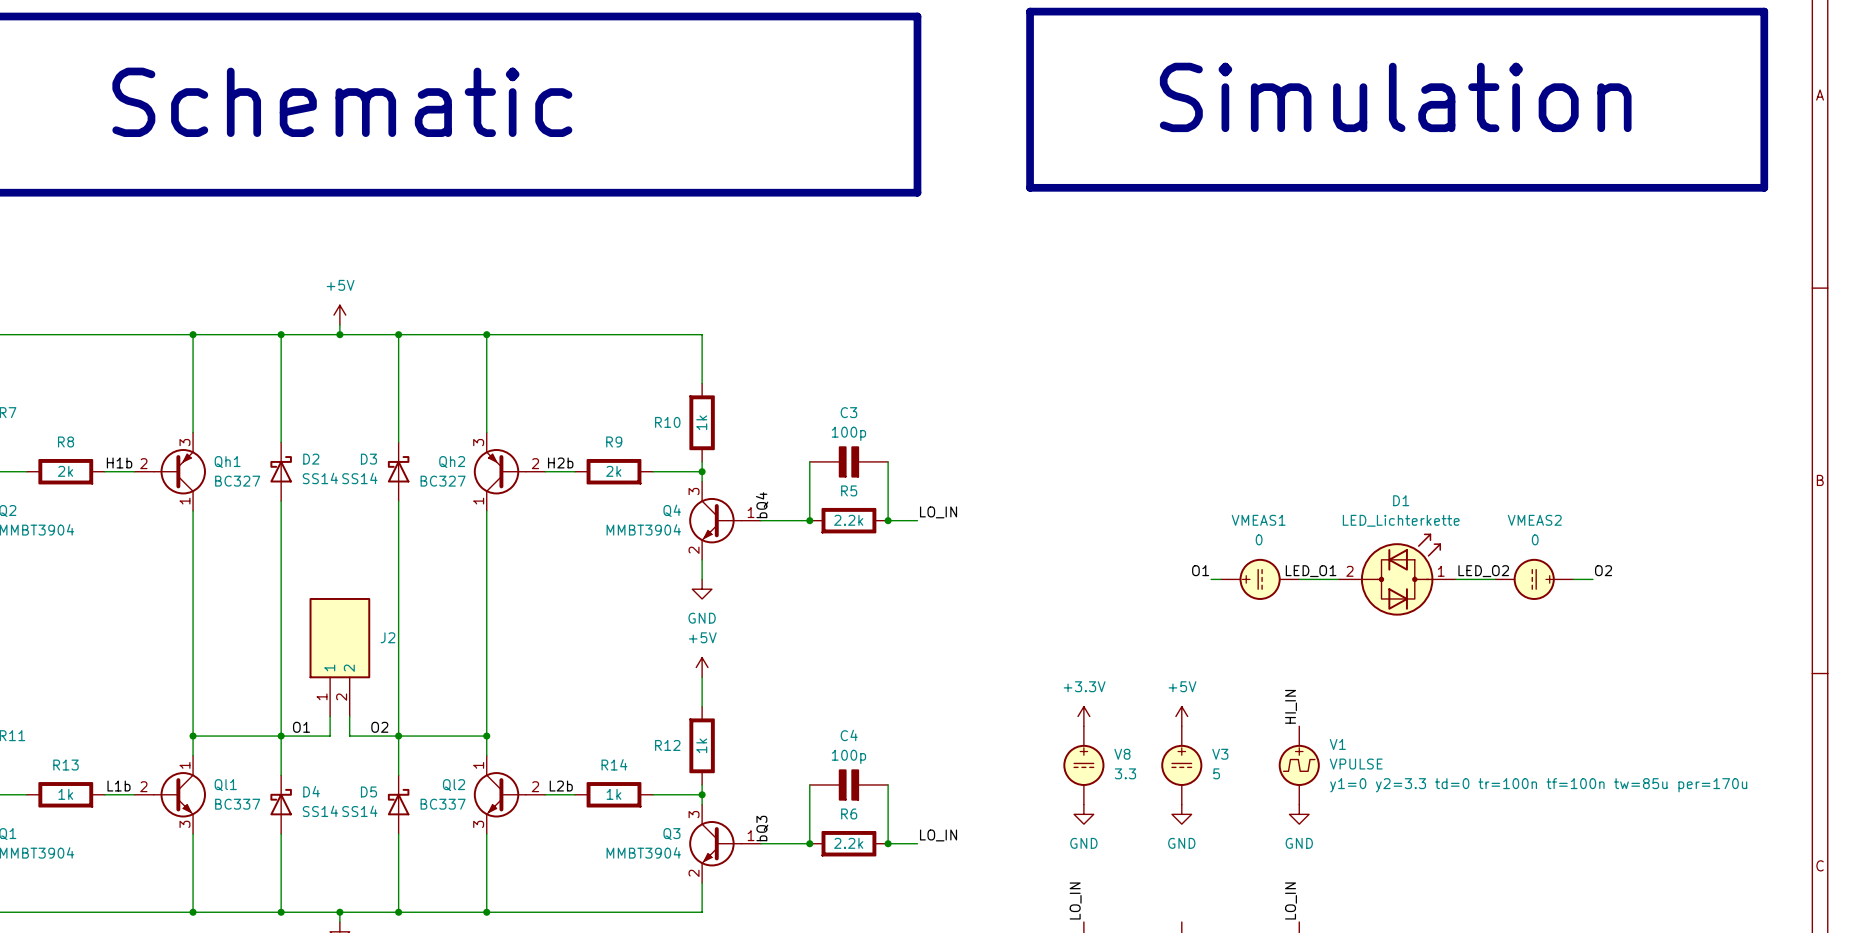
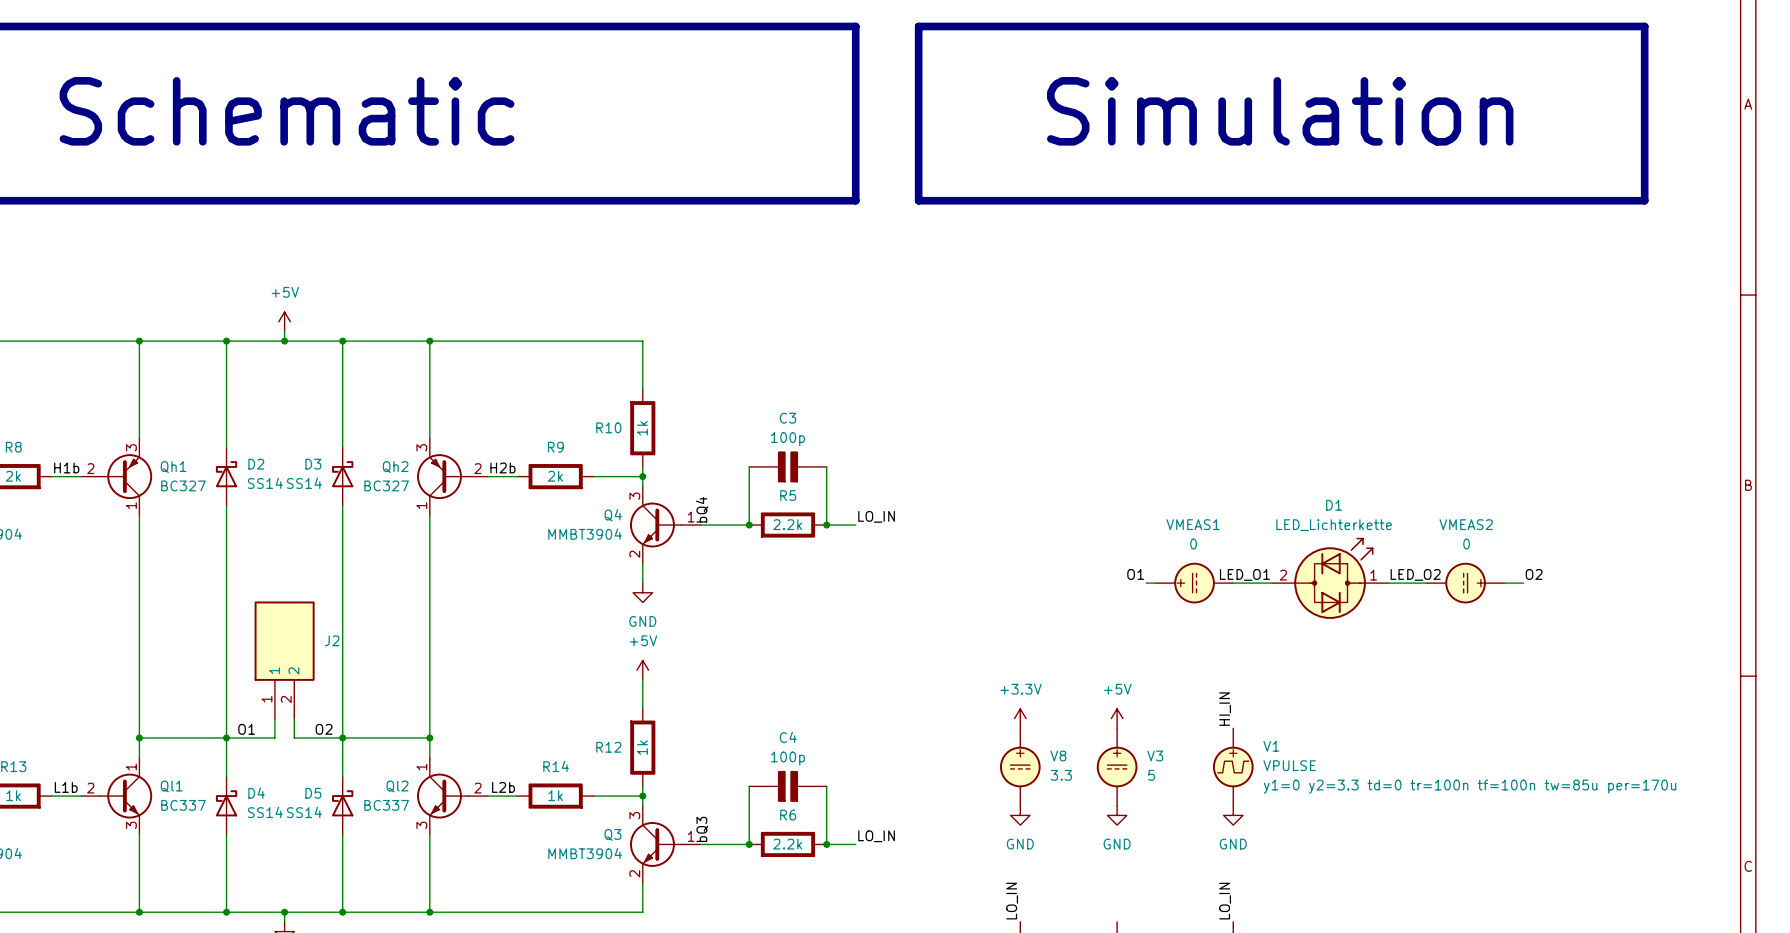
line: (1030, 11) (1764, 11) (1764, 187) (1030, 187) (1030, 11) -> (918, 26) (1644, 26) (1644, 200) (918, 200) (918, 26)
text position: Simulation (1395, 97) -> Simulation (1280, 111)

